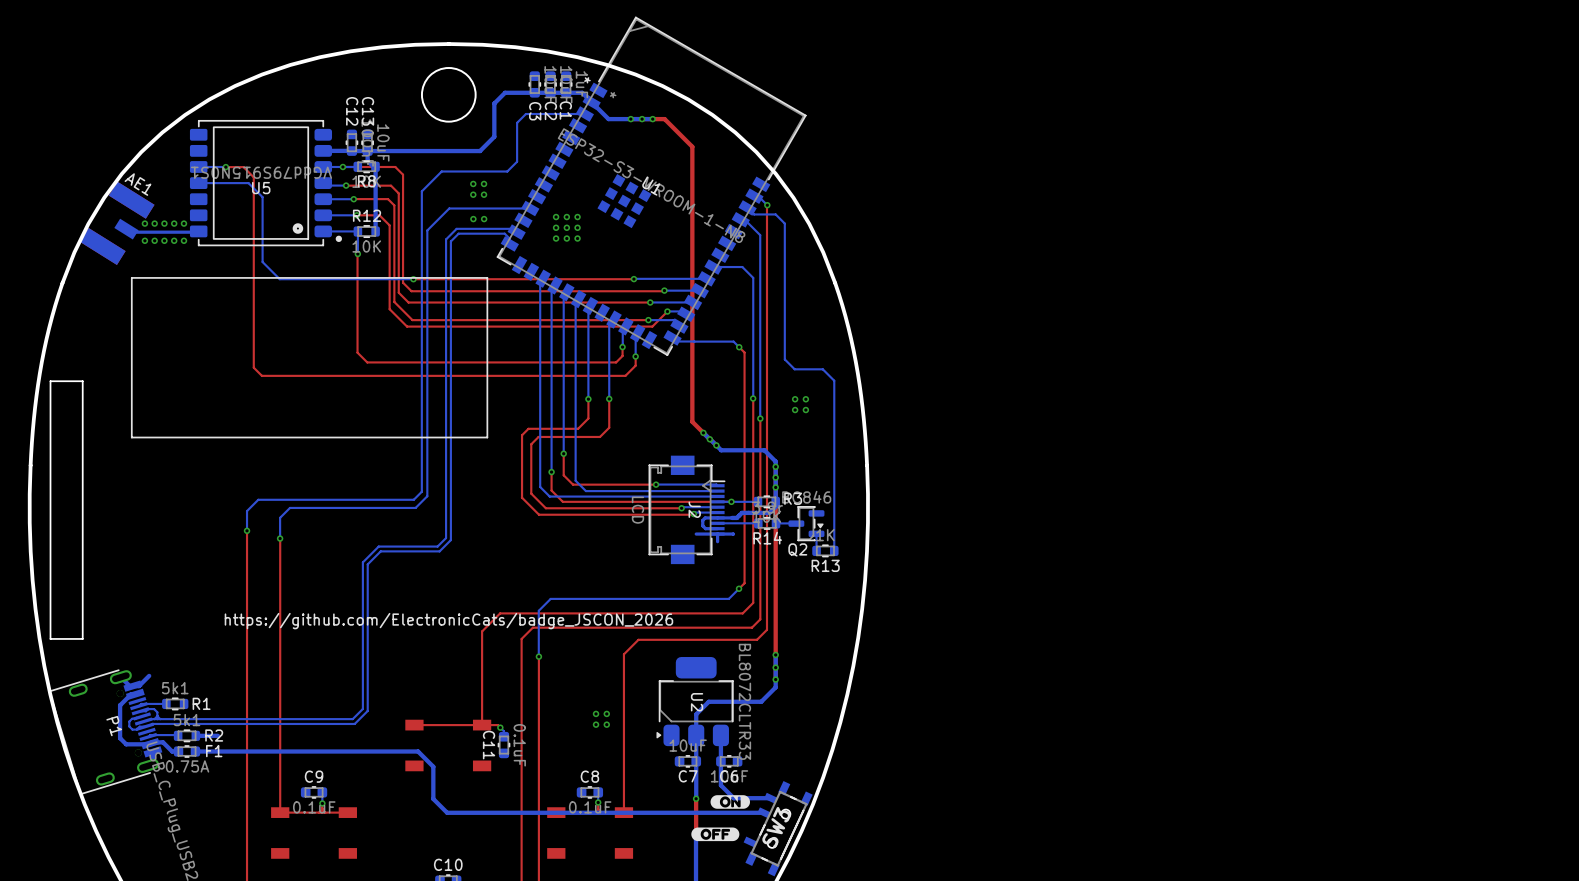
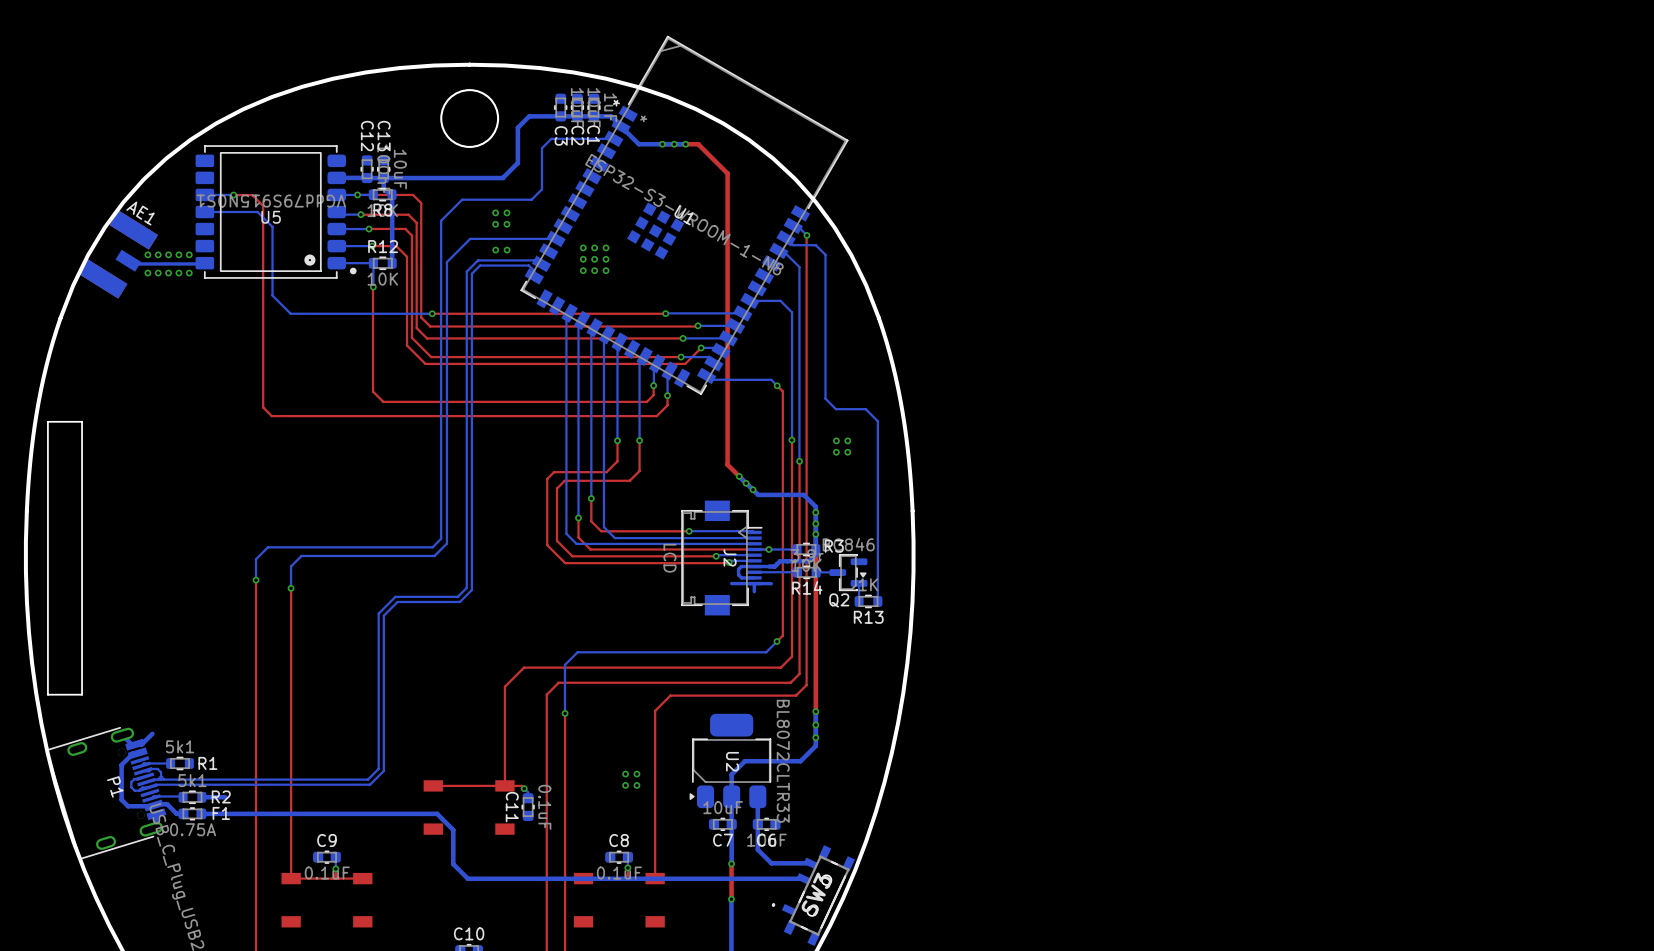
line: (487, 277) (131, 277) (131, 437) (487, 437) (487, 277) -> none
text: https://github.com/ElectronicCats/badge_JSCON_2026 (448, 621) -> none
drawing: [710, 795, 750, 809] -> none
drawing: [691, 827, 740, 842] -> none

